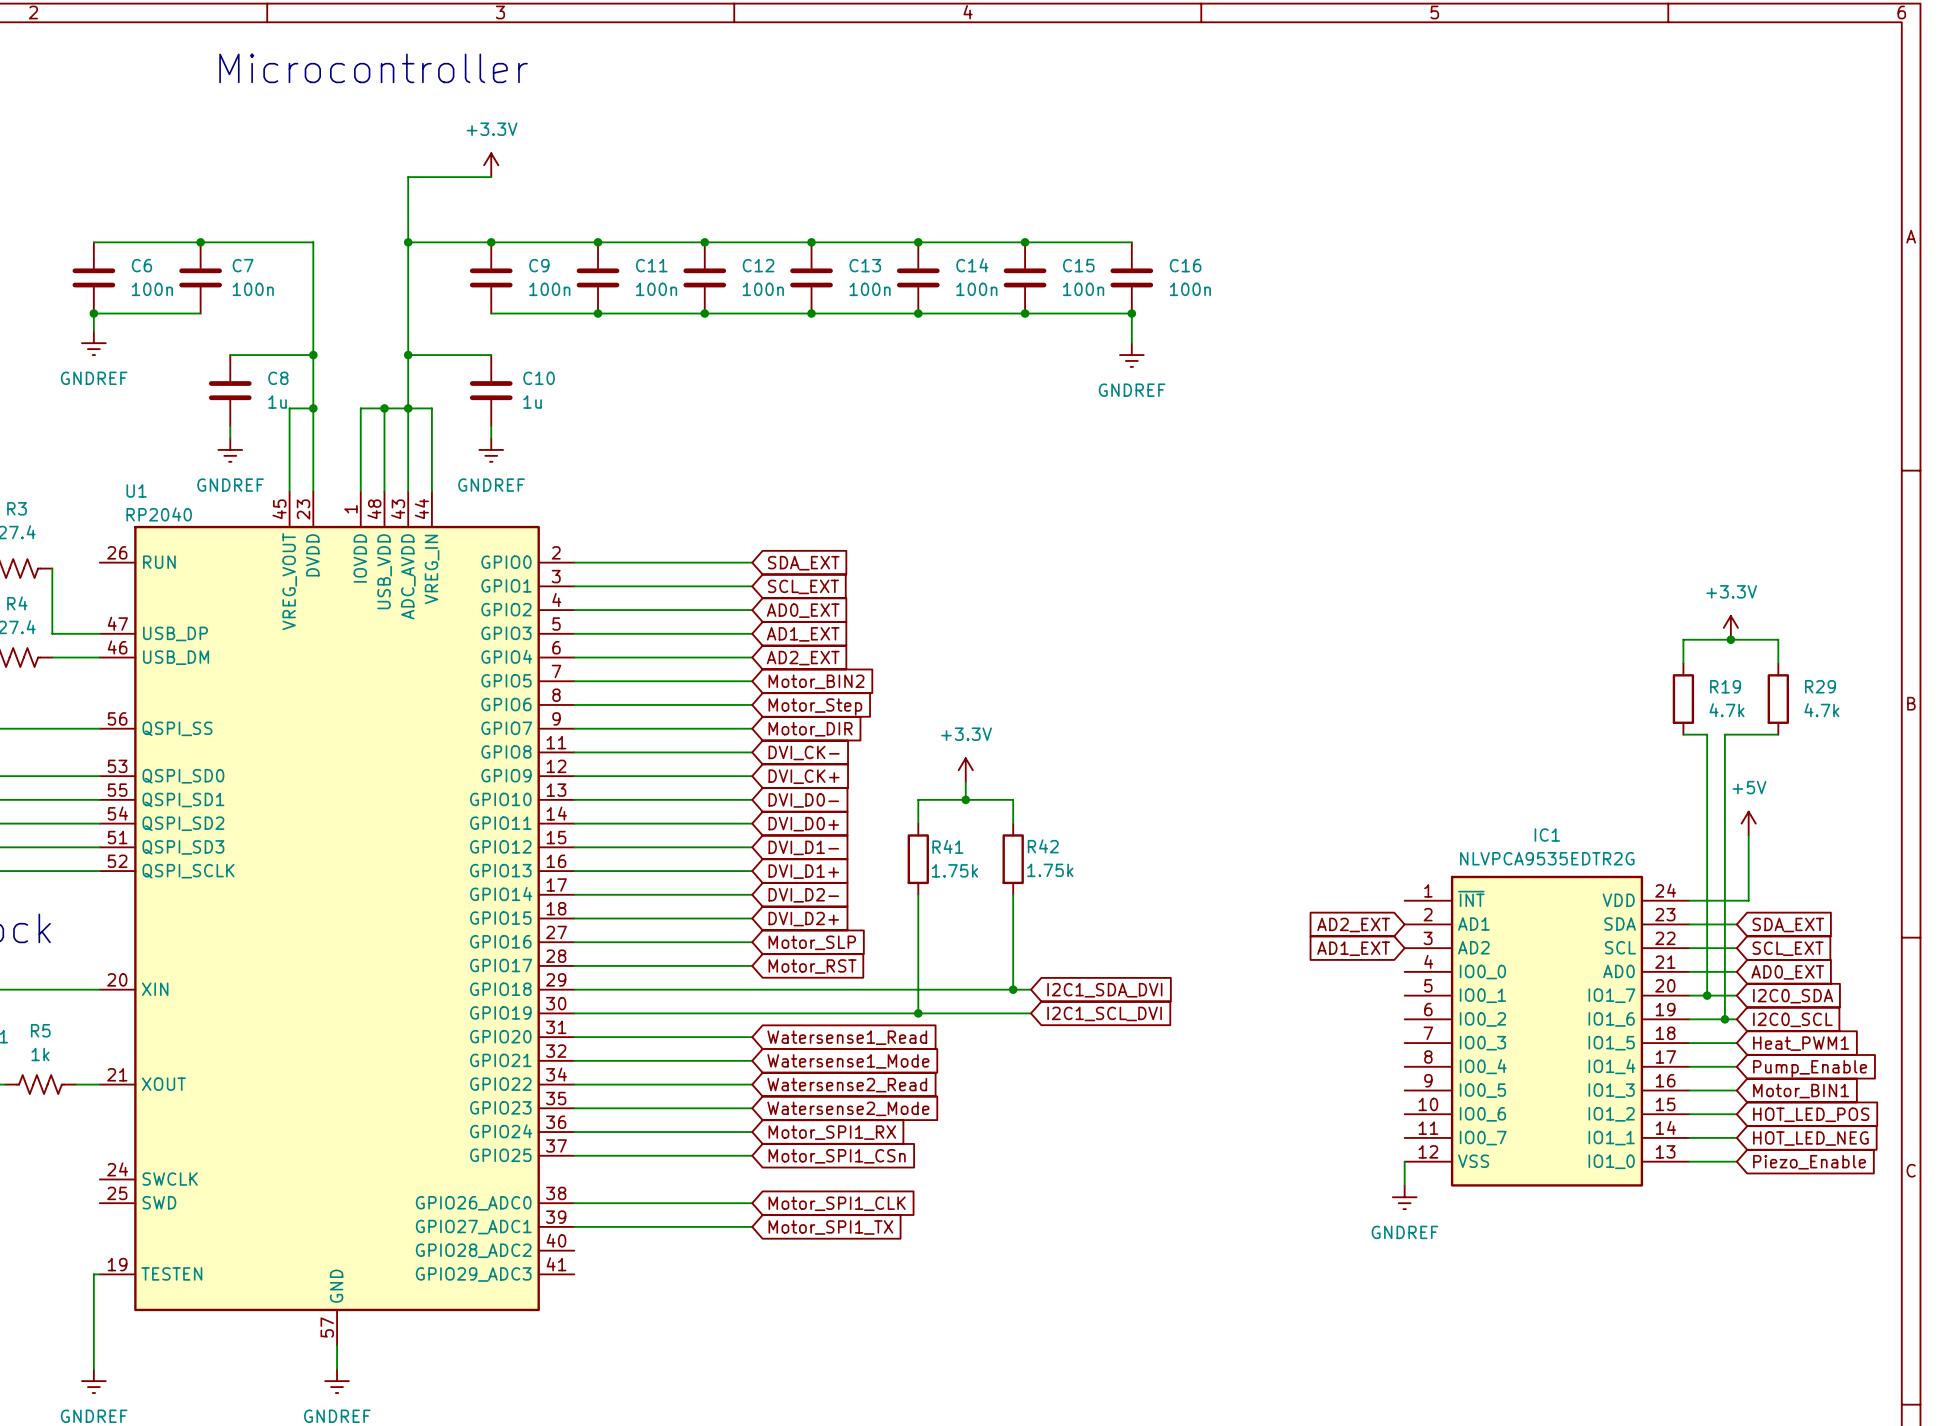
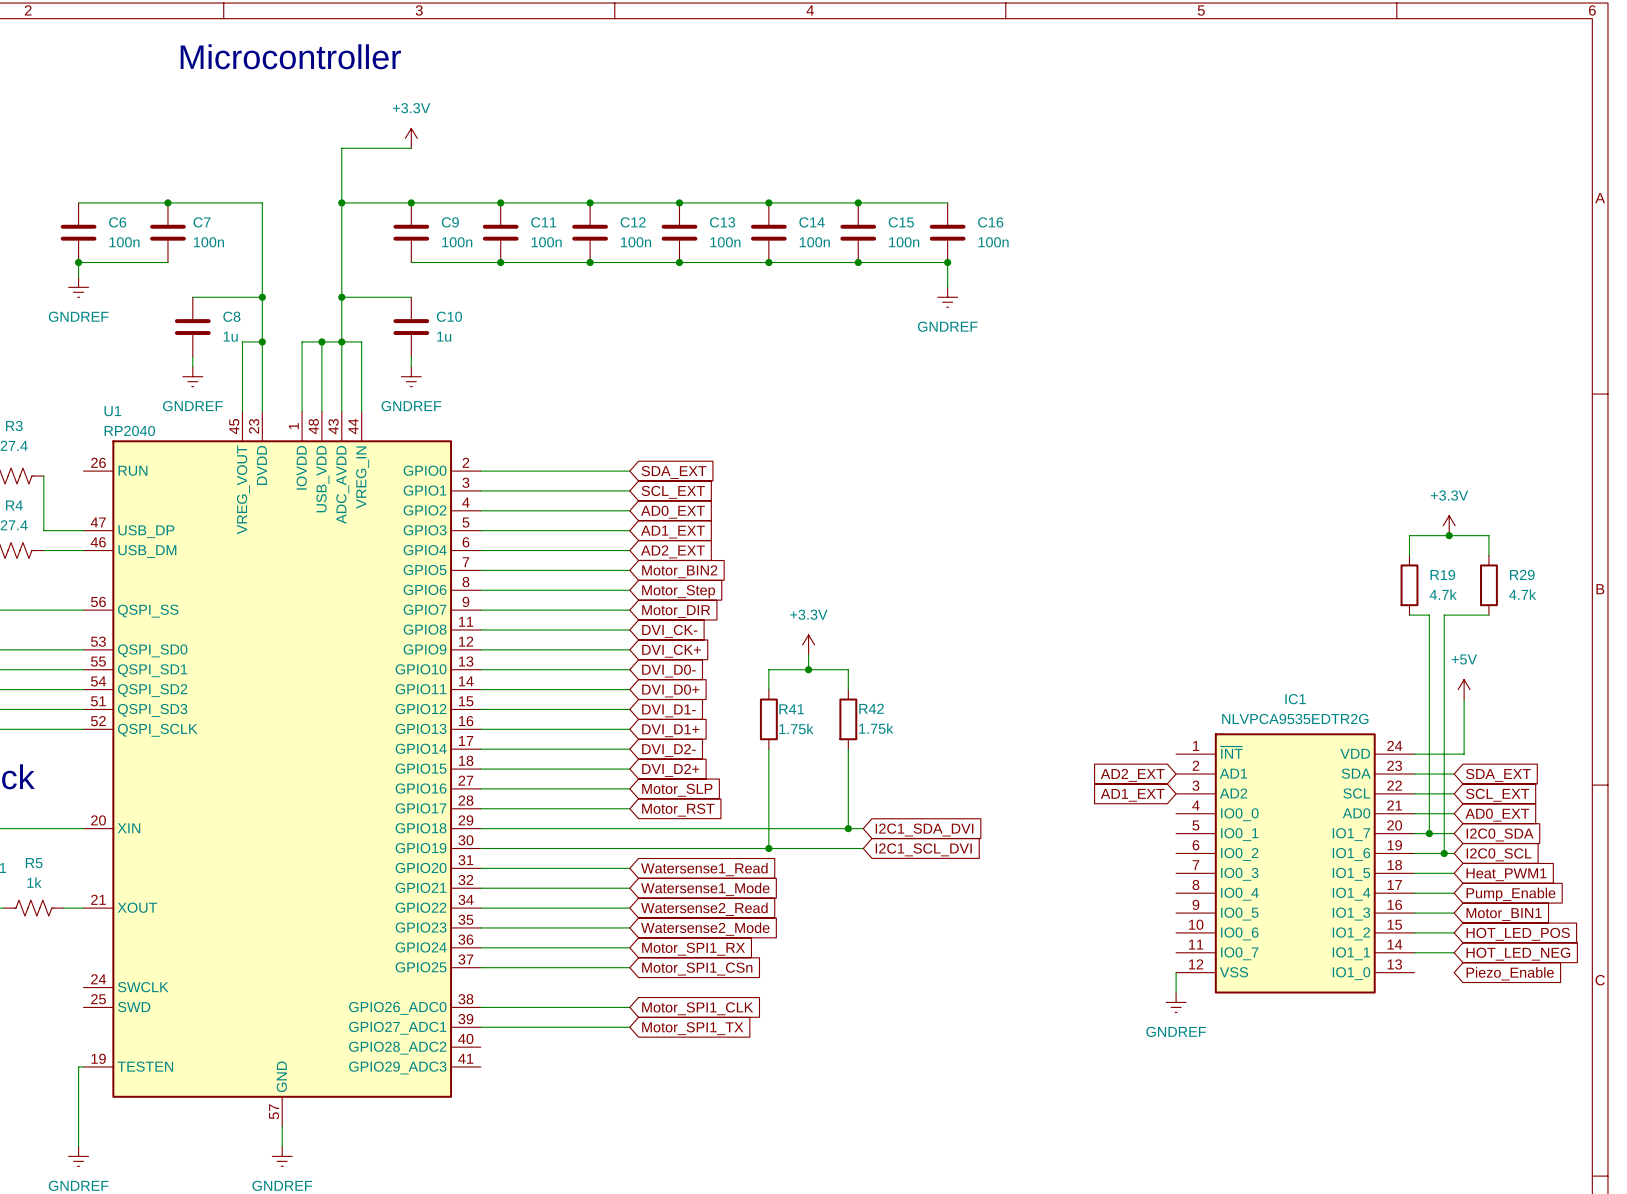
wire: (1689, 1161) (1736, 1161) -> none

